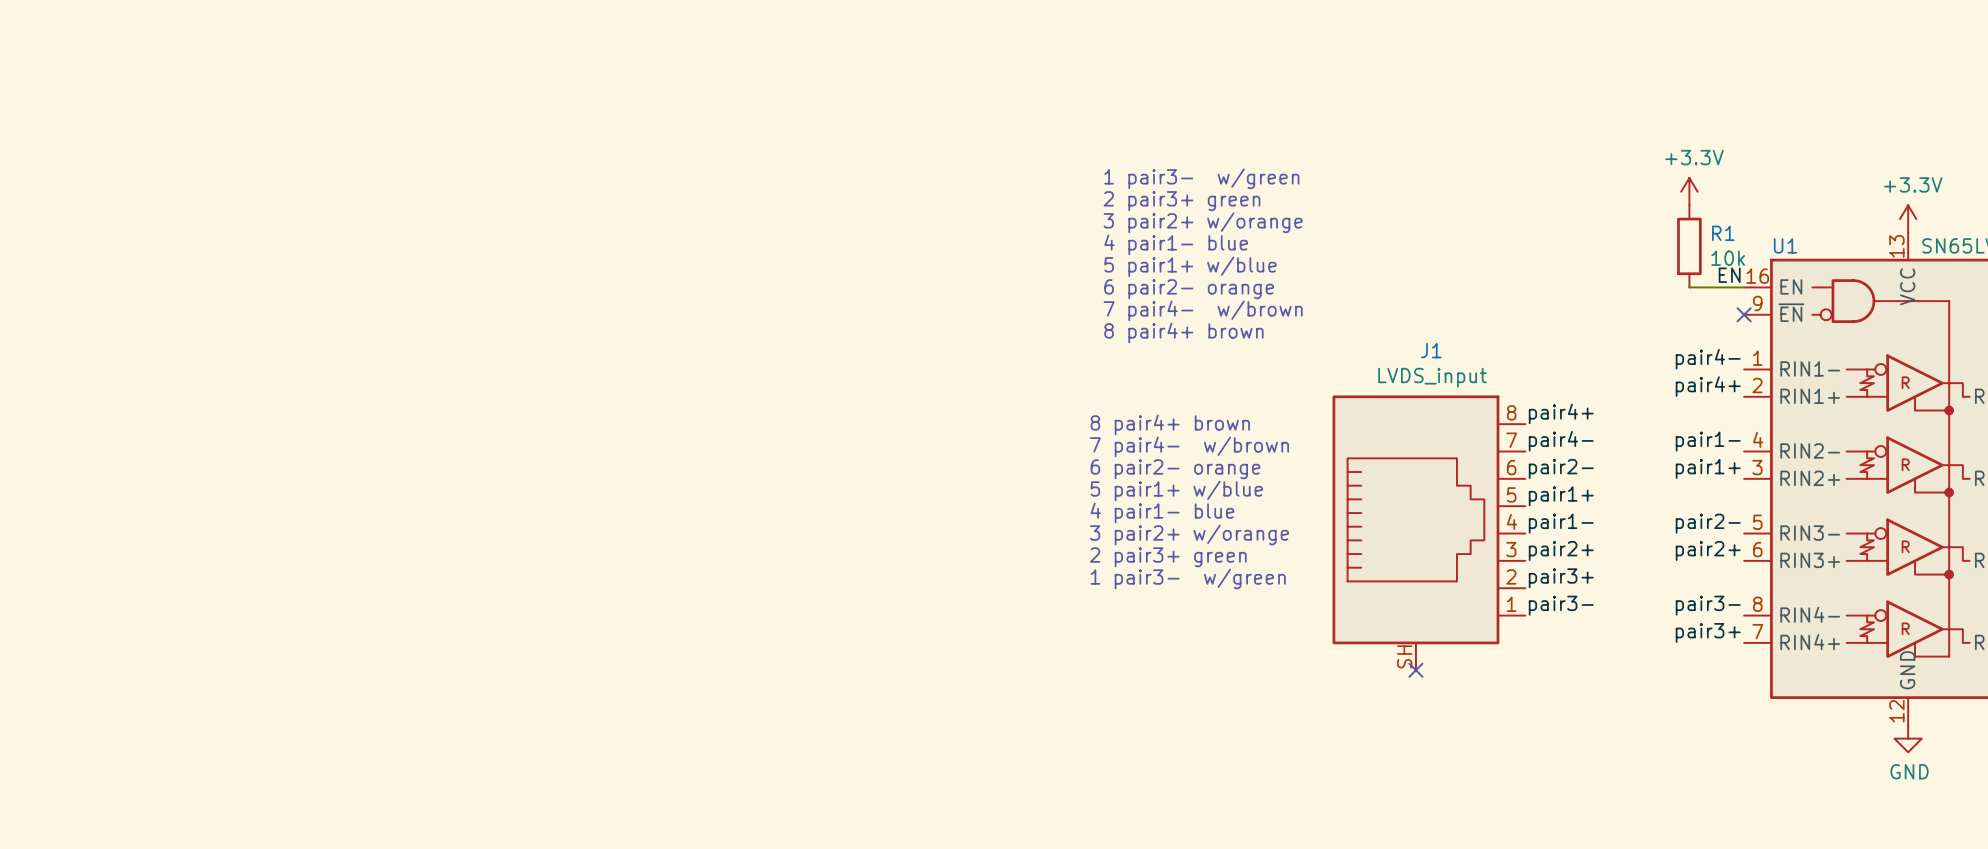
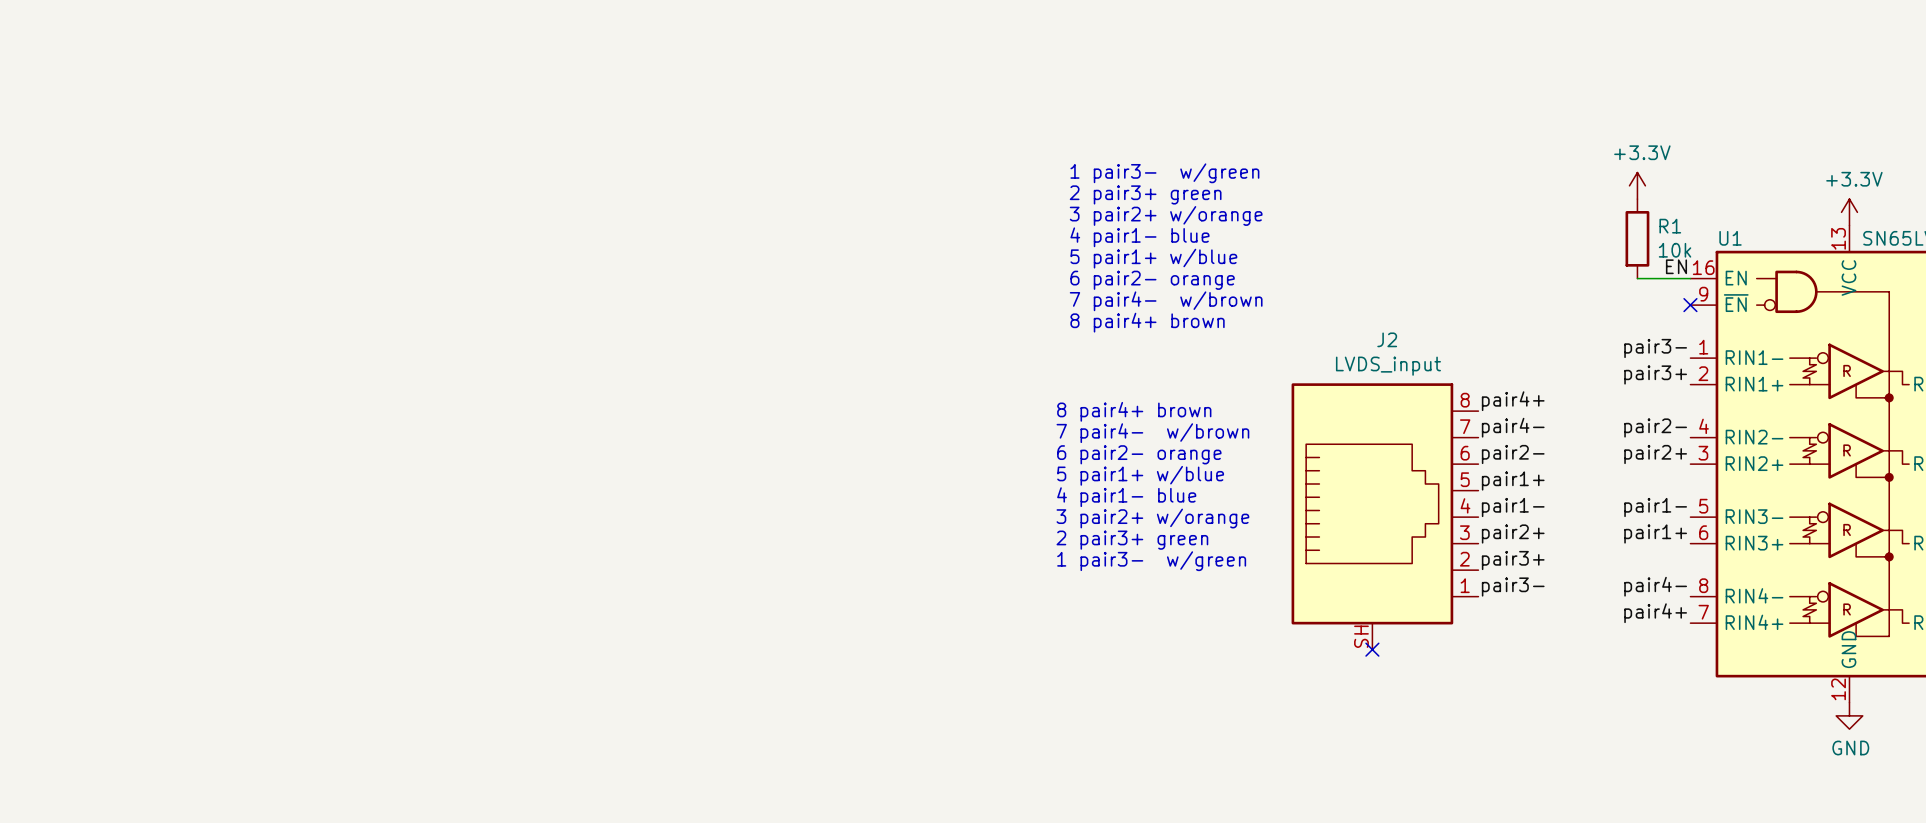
J1 name: J1 (1431, 350) -> J2 (1387, 339)
label: pair4- (1708, 359) -> pair3- (1655, 348)
label: pair4+ (1708, 386) -> pair3+ (1655, 374)
label: pair1- (1708, 441) -> pair2- (1655, 428)
label: pair1+ (1708, 468) -> pair2+ (1655, 454)
label: pair2- (1708, 523) -> pair1- (1655, 507)
label: pair2+ (1708, 550) -> pair1+ (1655, 534)
label: pair3- (1708, 605) -> pair4- (1655, 586)
label: pair3+ (1708, 632) -> pair4+ (1655, 613)

